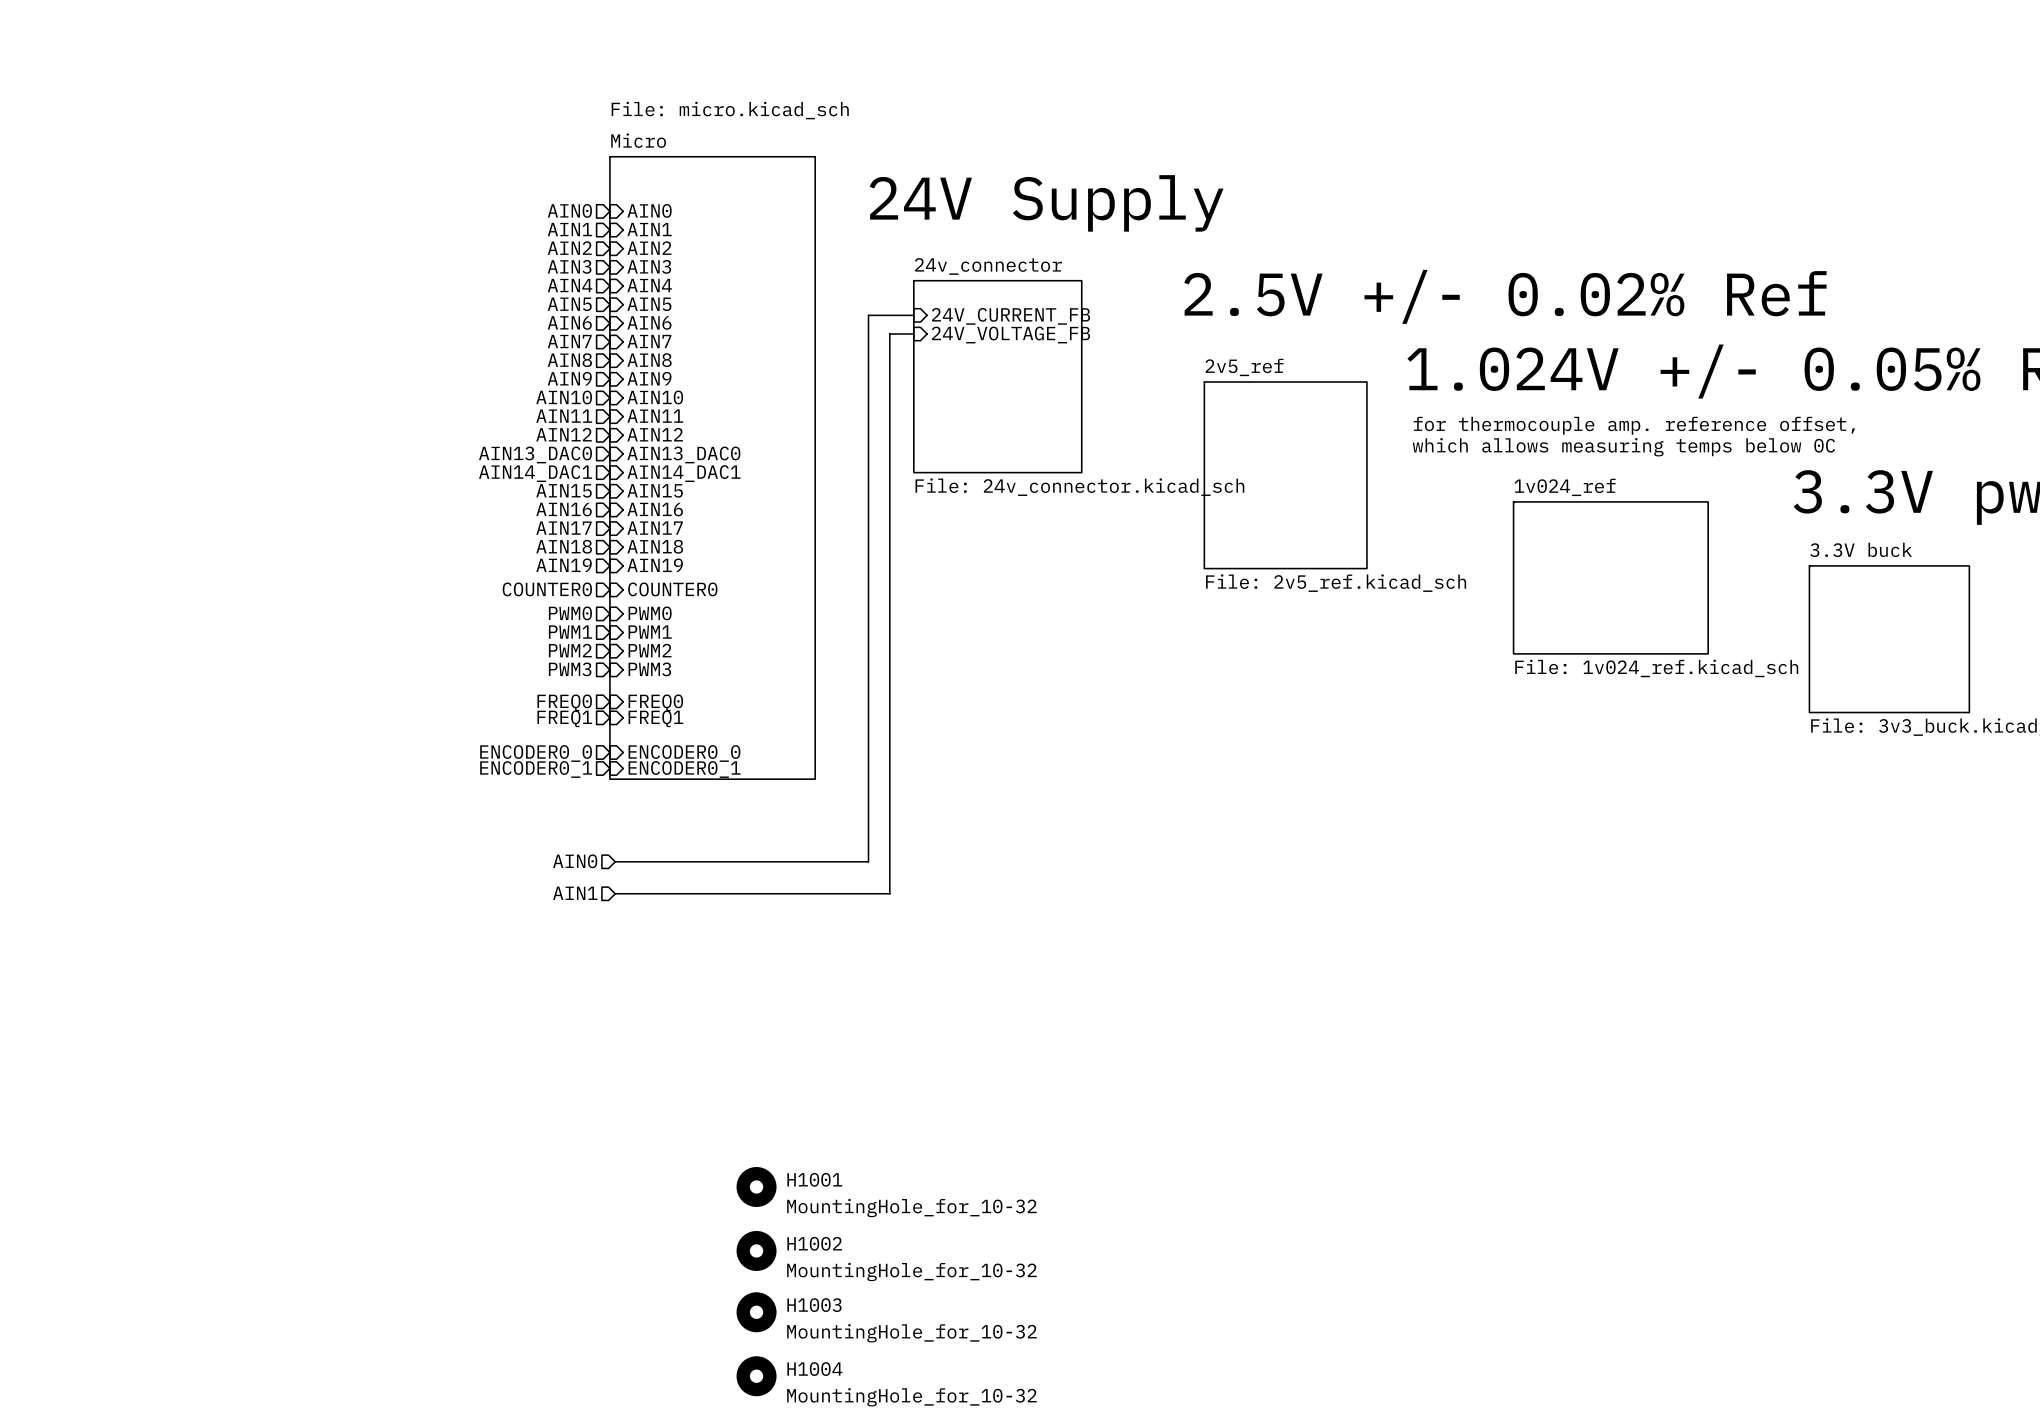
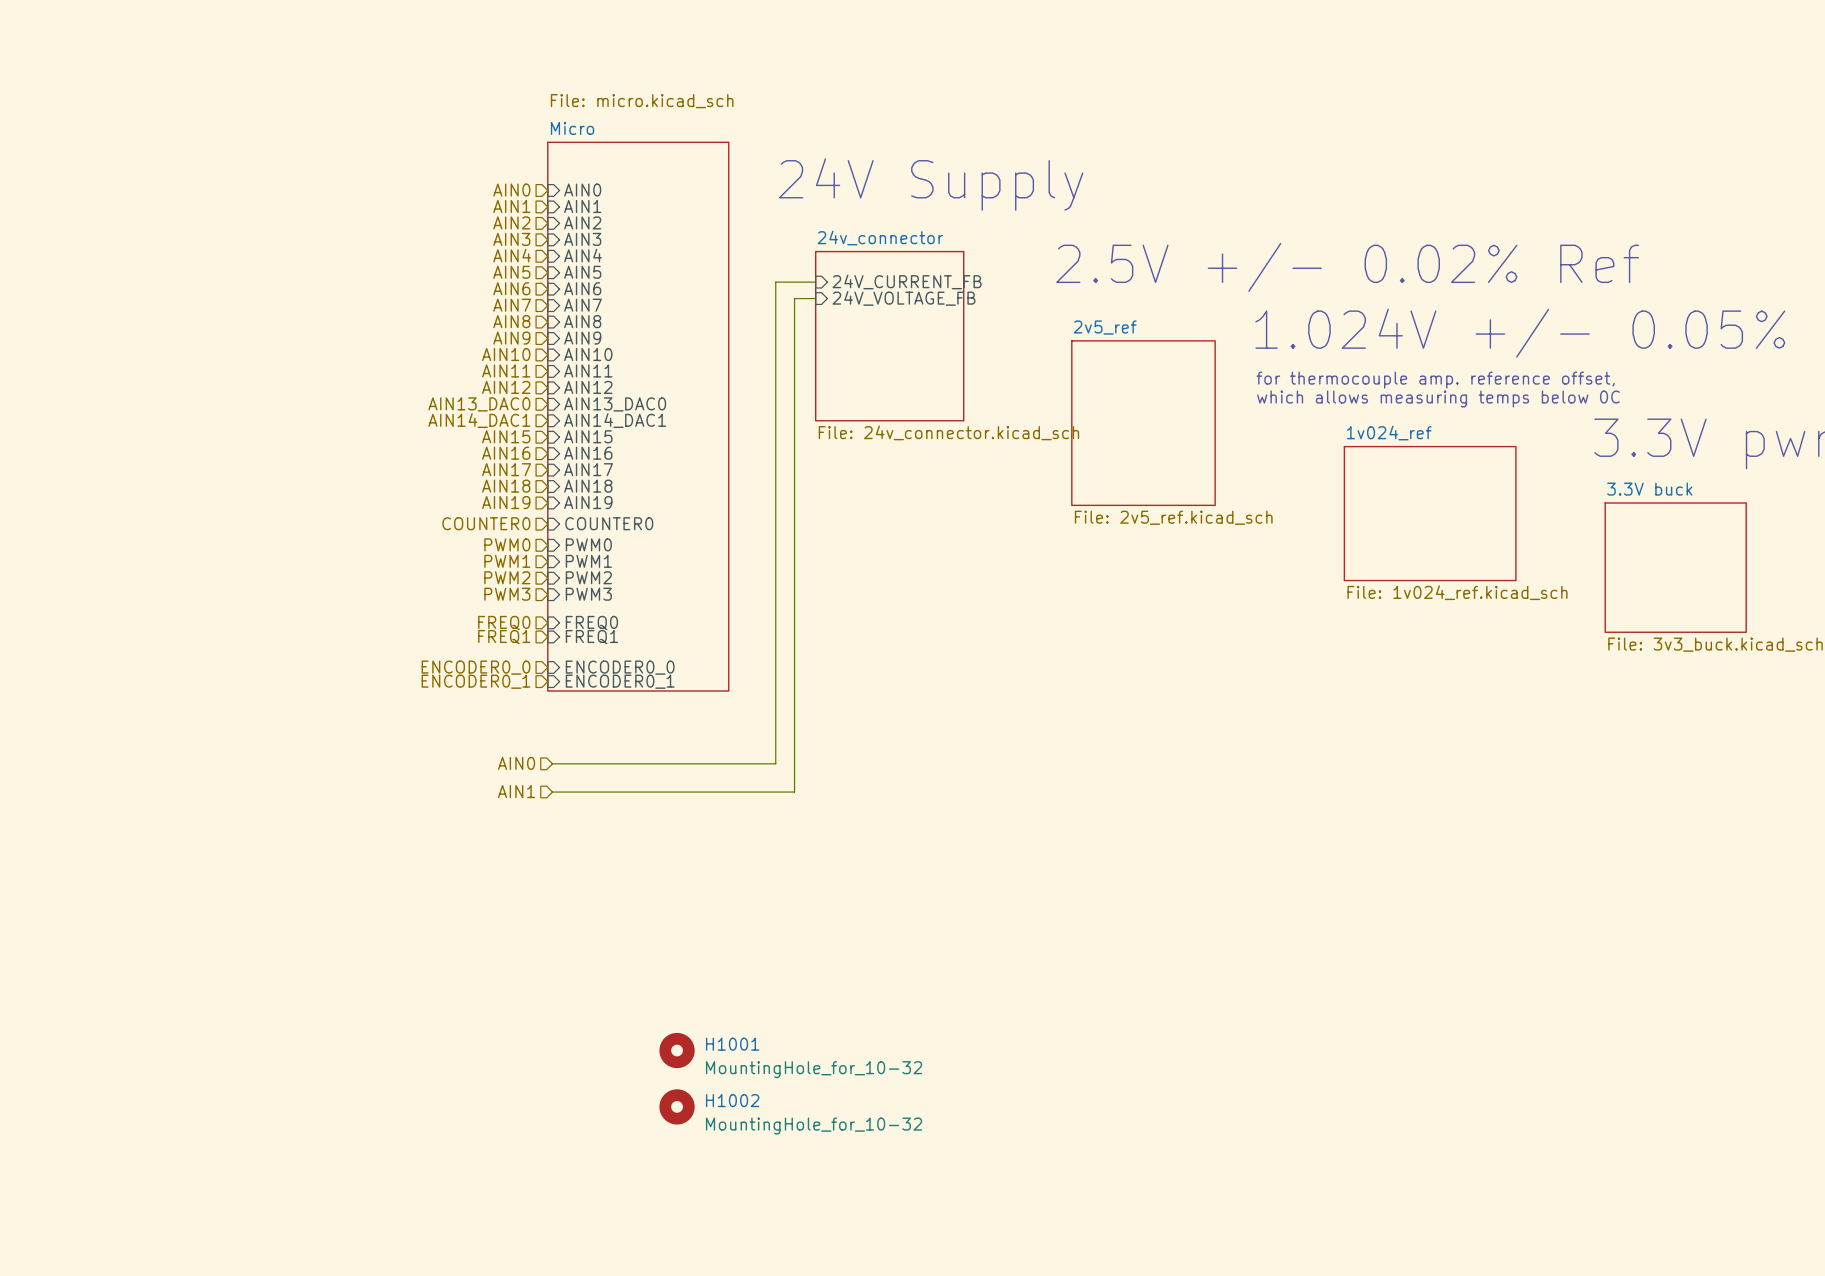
H1003: MountingHole_for_10-32 (756, 1312) -> none
H1004: MountingHole_for_10-32 (756, 1376) -> none

